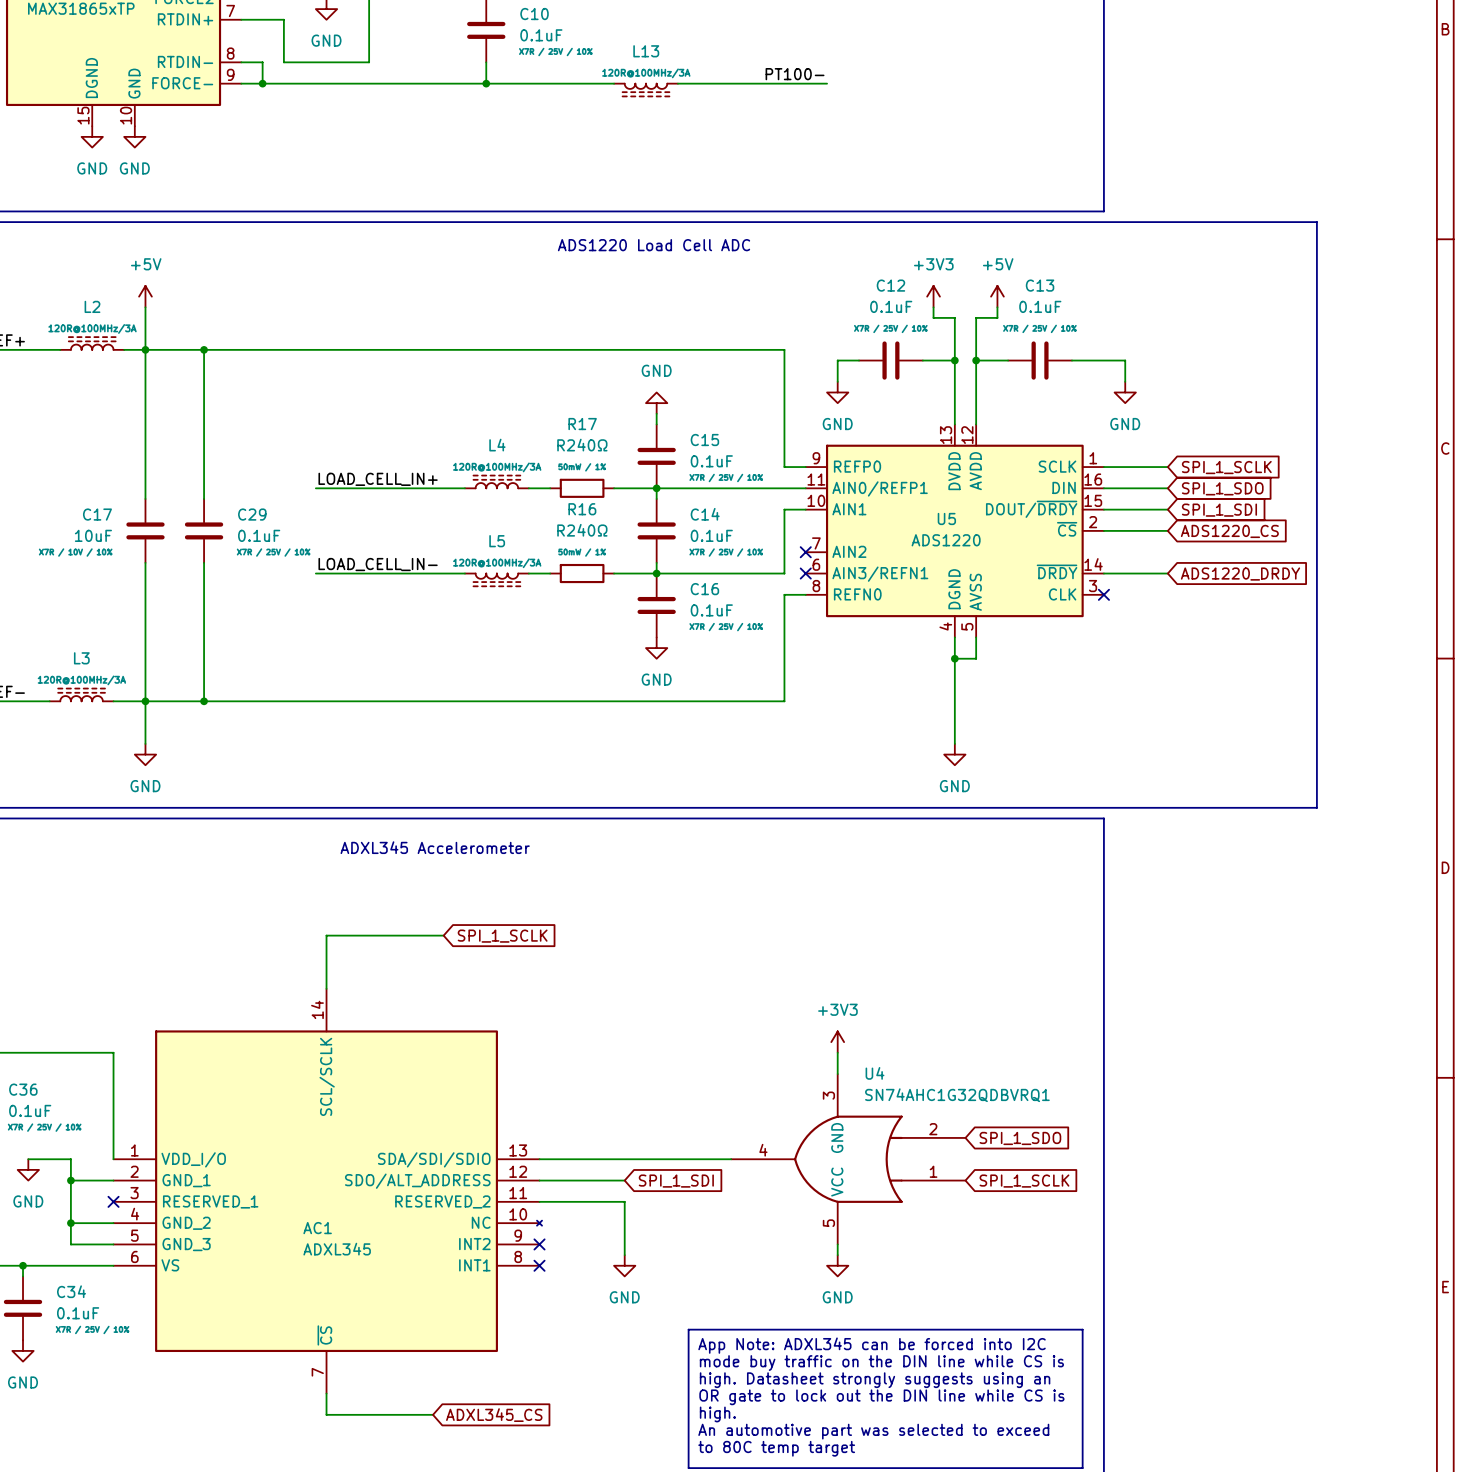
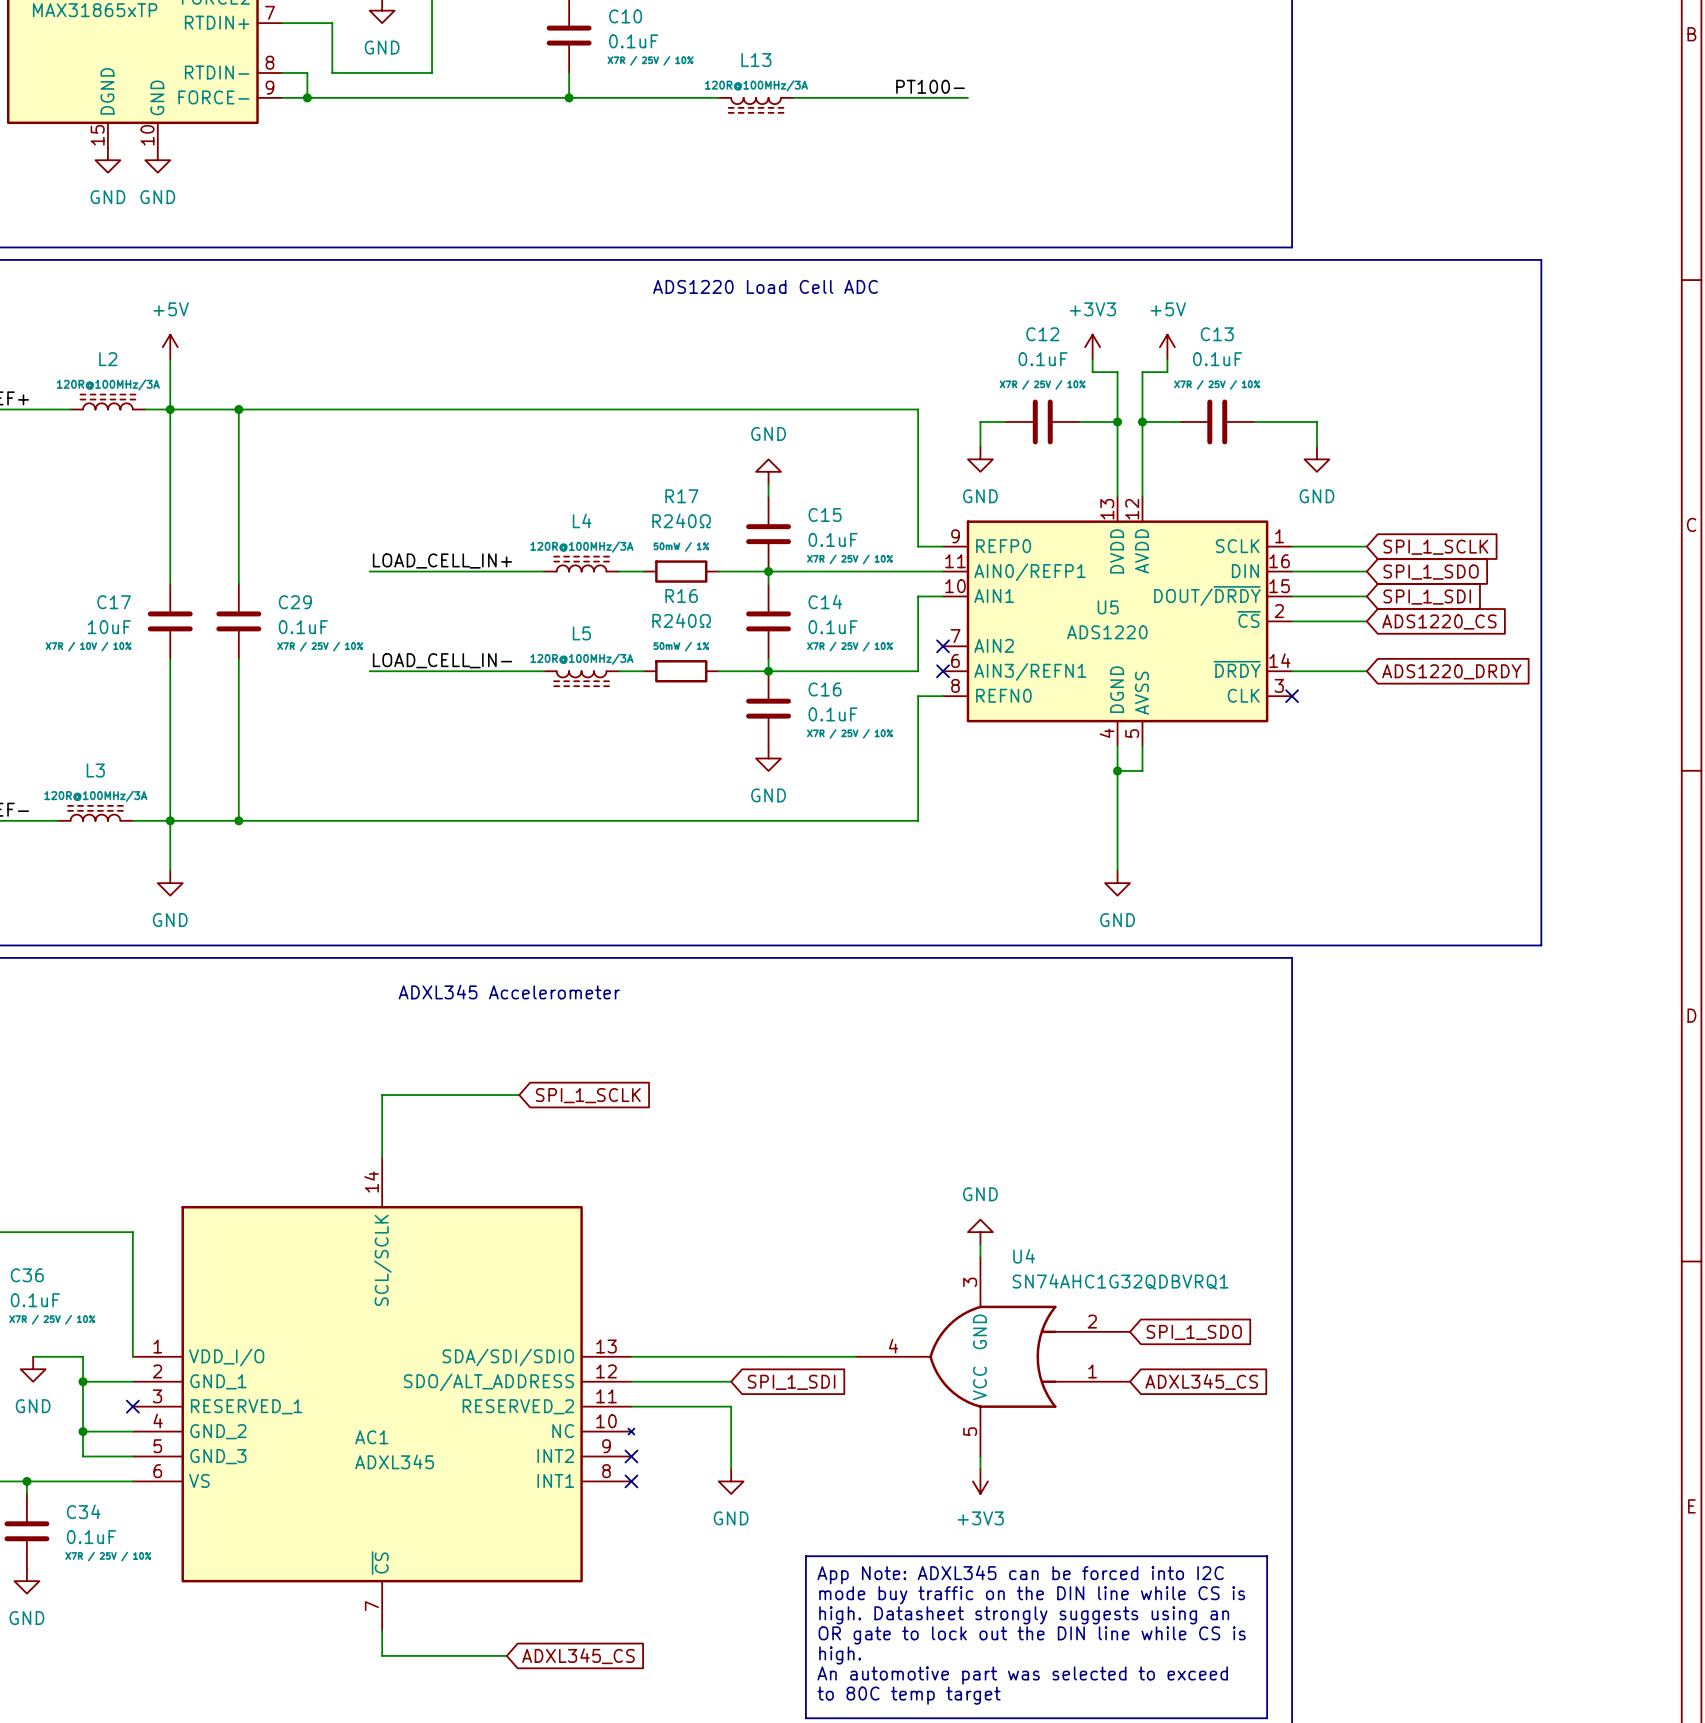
power symbol: +3V3 (837, 1042) -> none
power symbol: none -> GND (980, 1232)
global label: SPI_1_SCLK (1024, 1181) -> ADXL345_CS (1201, 1382)
power symbol: GND (837, 1265) -> +3V3 (980, 1481)

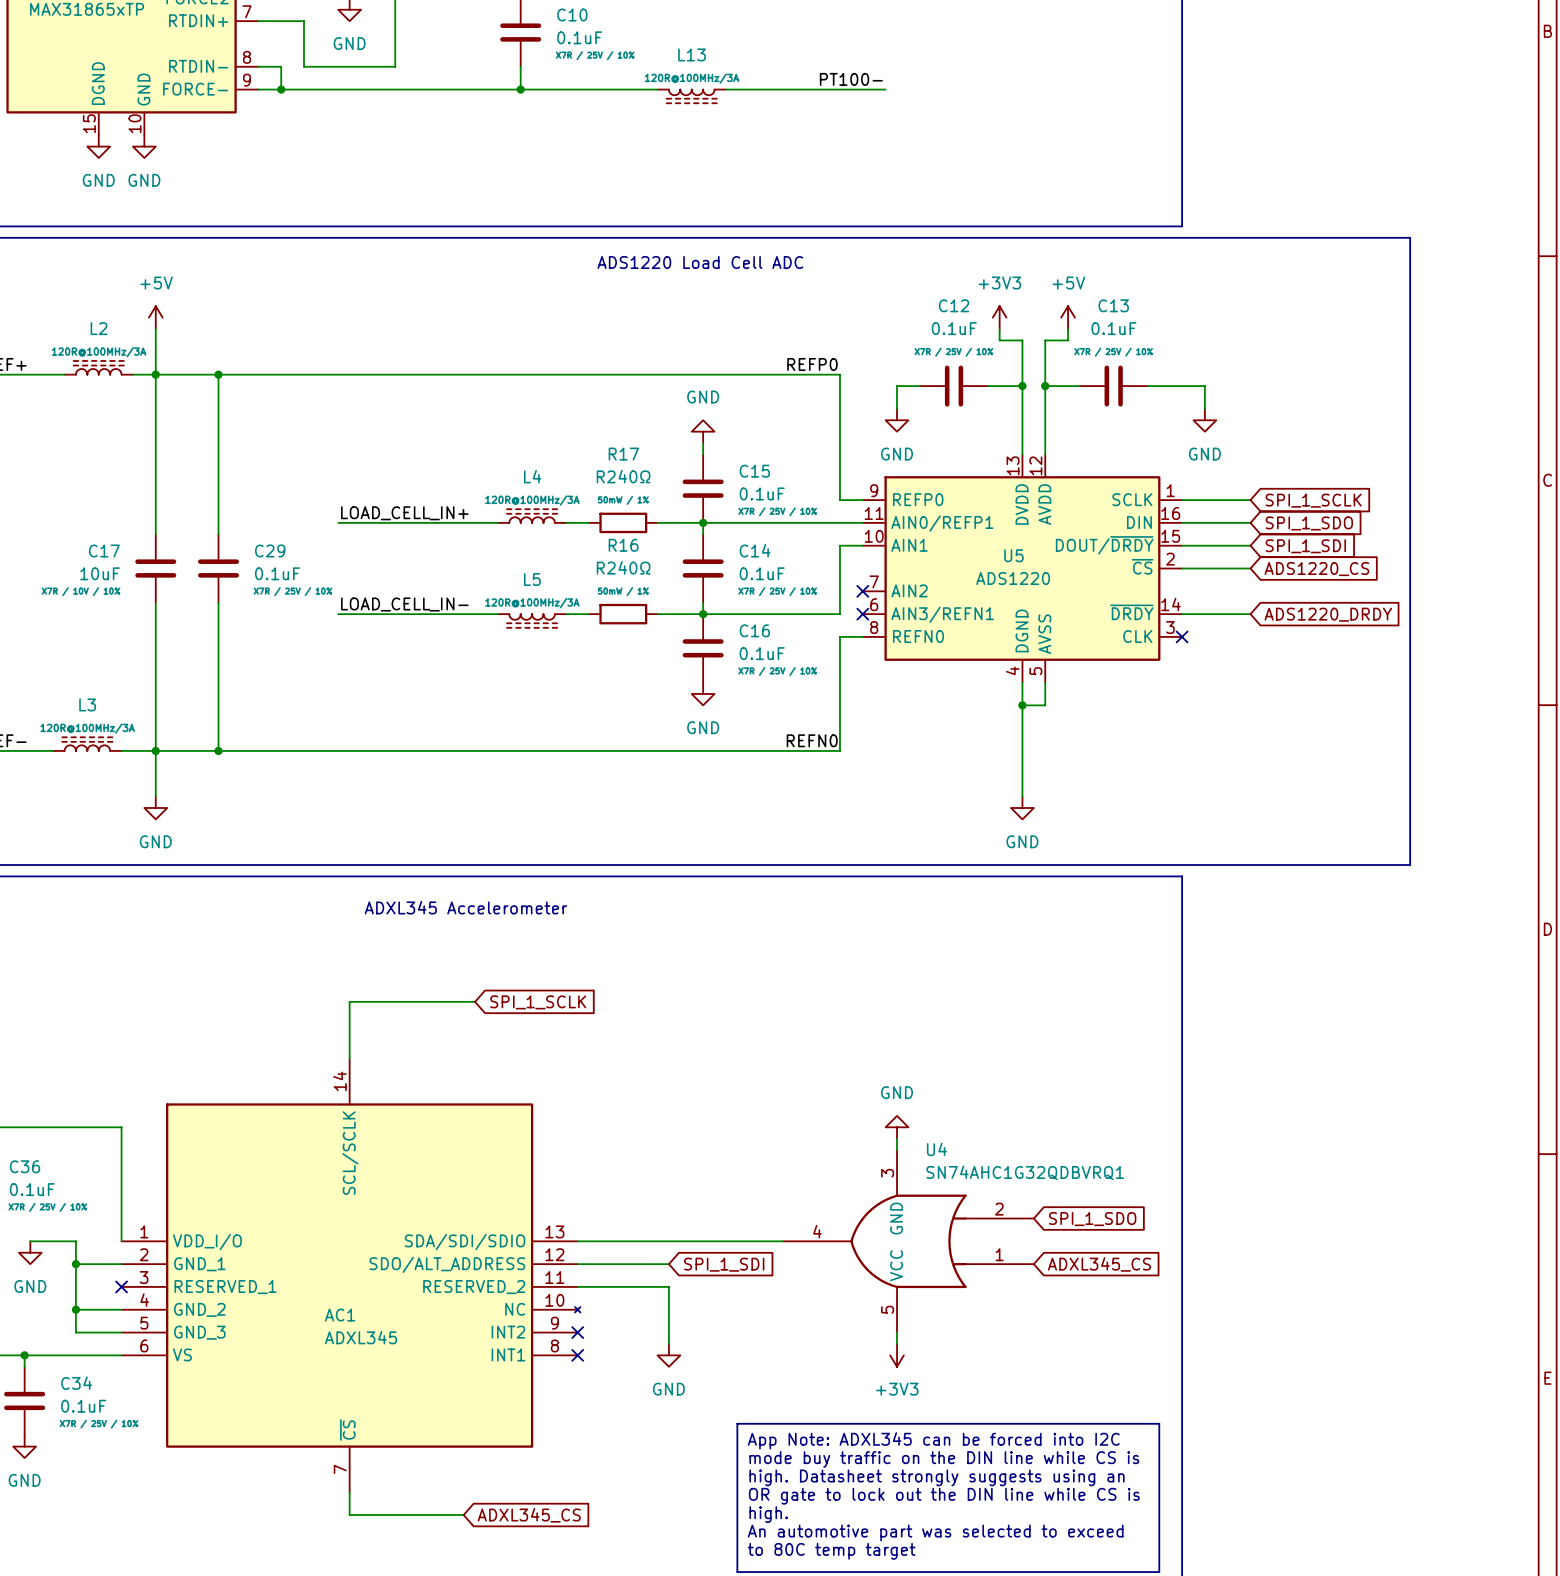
label: none -> REFP0 (812, 364)
label: none -> REFN0 (812, 740)

